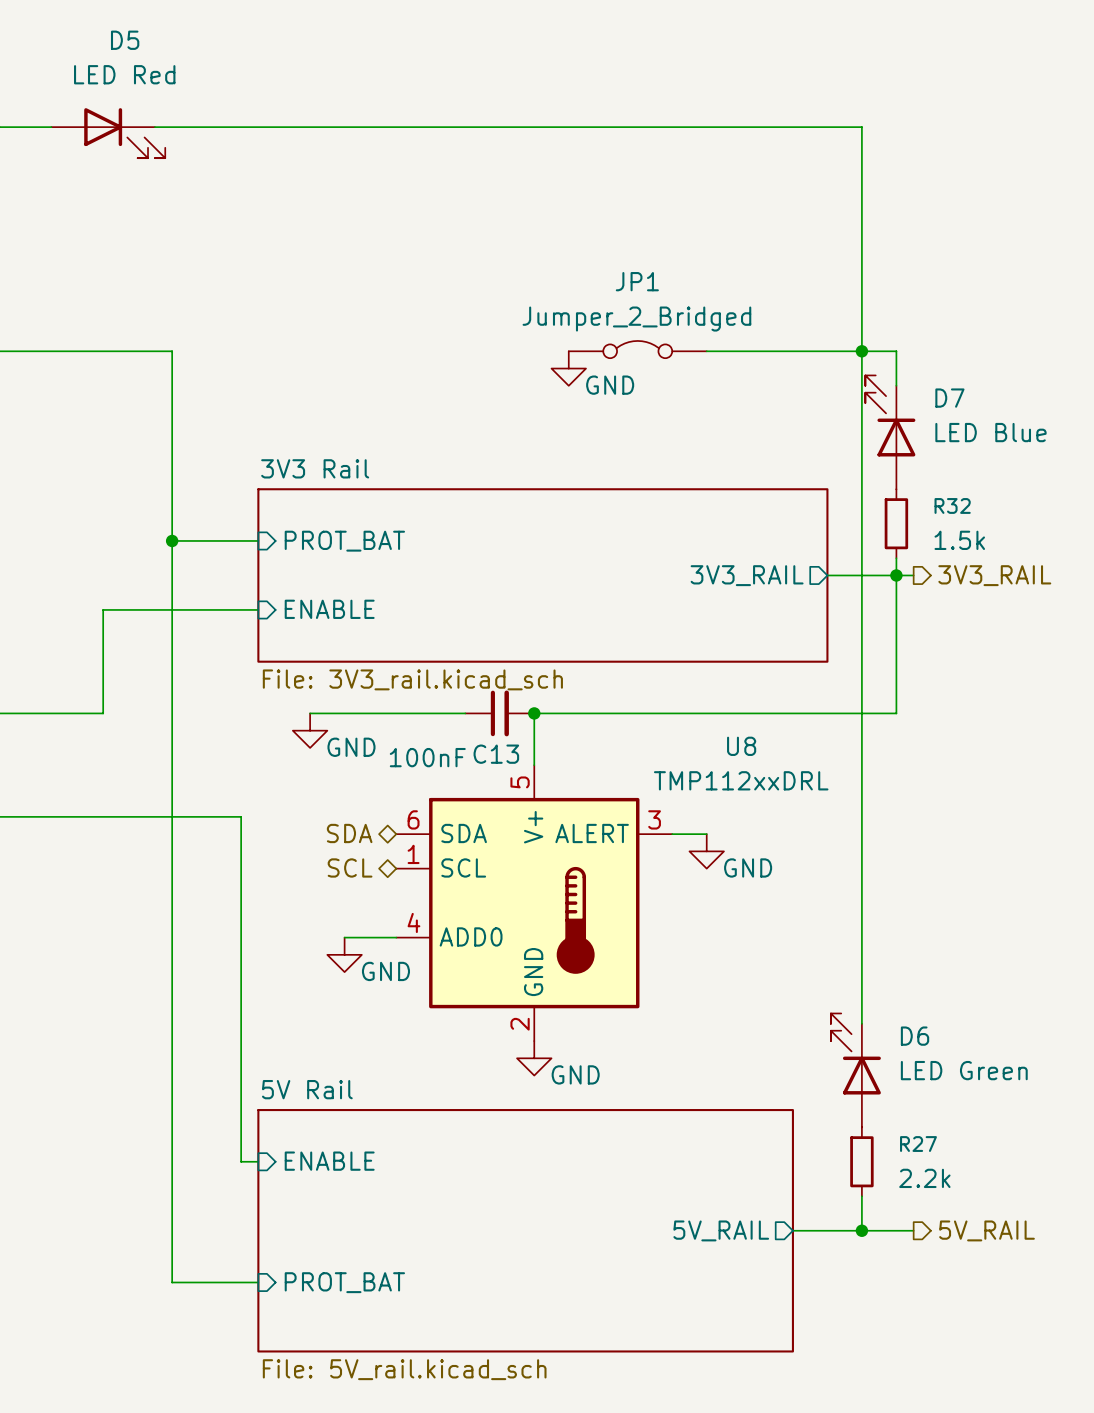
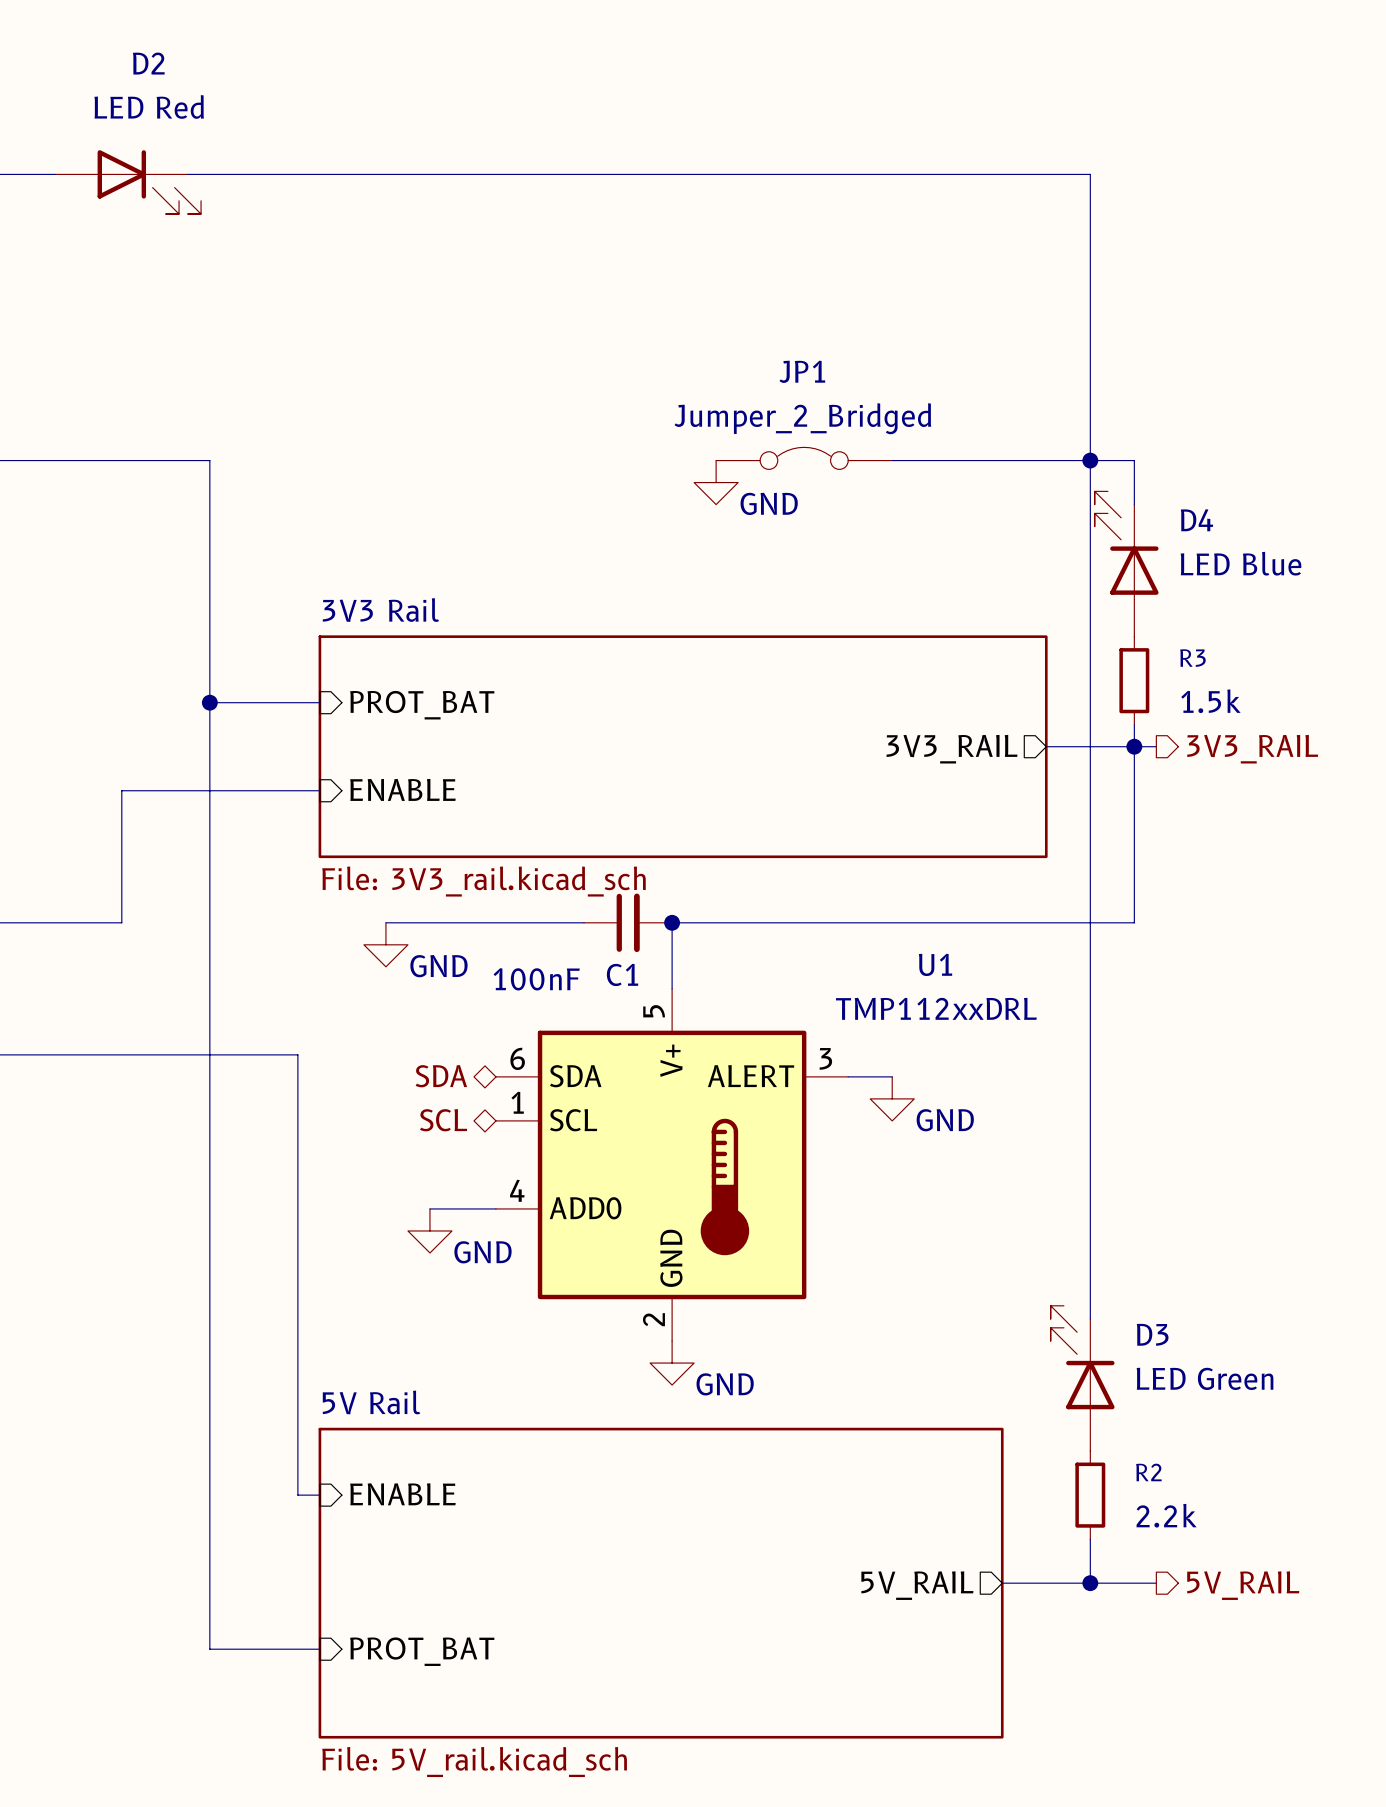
D5 name: D5 (125, 40) -> D2 (148, 63)
D7 name: D7 (949, 398) -> D4 (1196, 520)
R32 name: R32 (952, 505) -> R3 (1192, 658)
U8 name: U8 (741, 746) -> U1 (935, 964)
C13 name: C13 (496, 754) -> C1 (622, 974)
D6 name: D6 (915, 1036) -> D3 (1152, 1334)
R27 name: R27 (918, 1144) -> R2 (1148, 1472)

